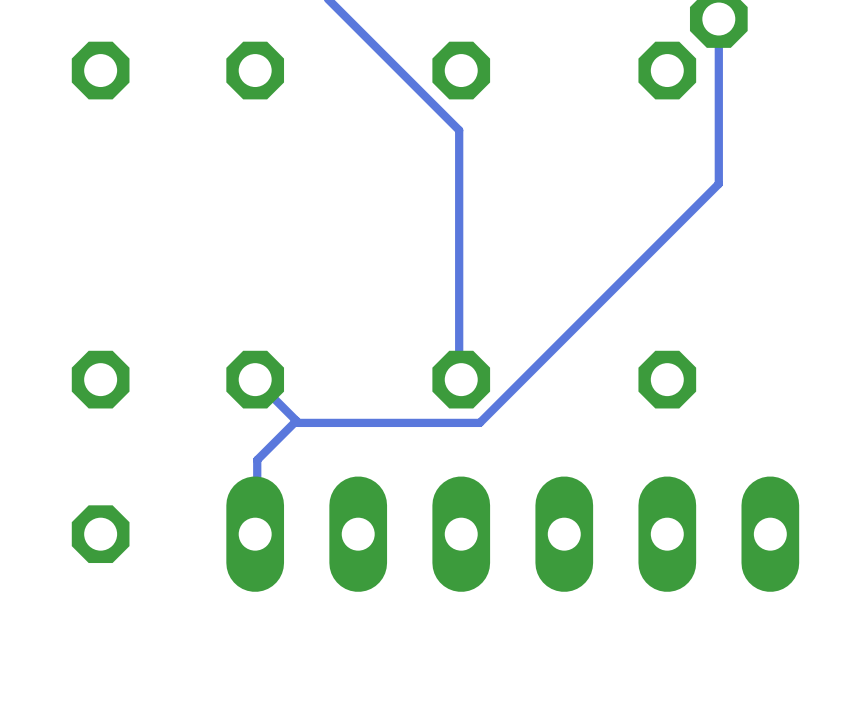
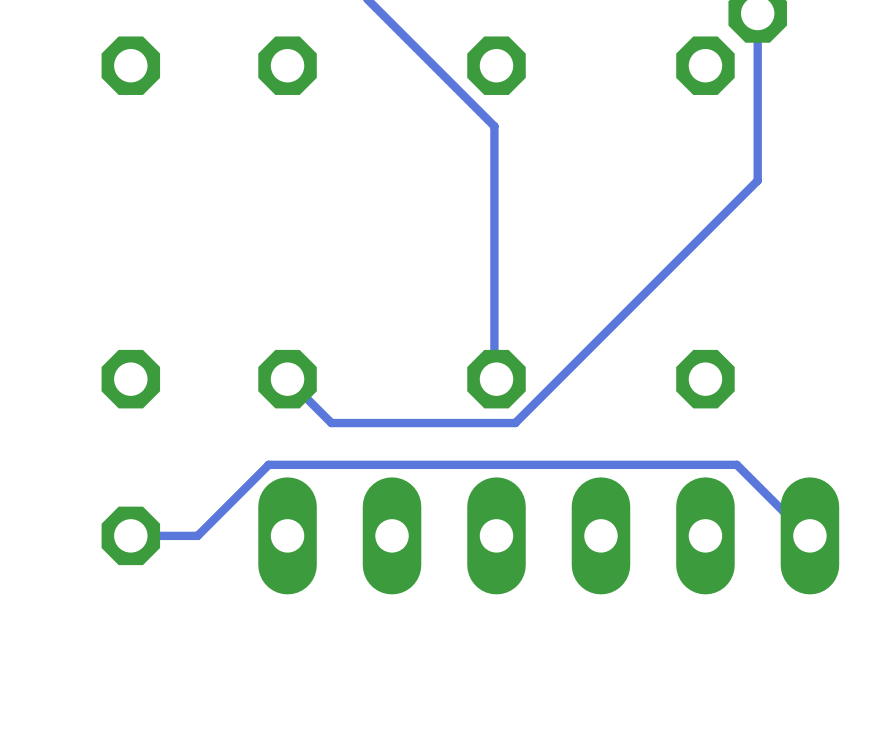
track: (296, 420) (257, 459) (257, 534) (255, 534) -> none
track: none -> (809, 535) (736, 464) (268, 464) (197, 535) (130, 535)

